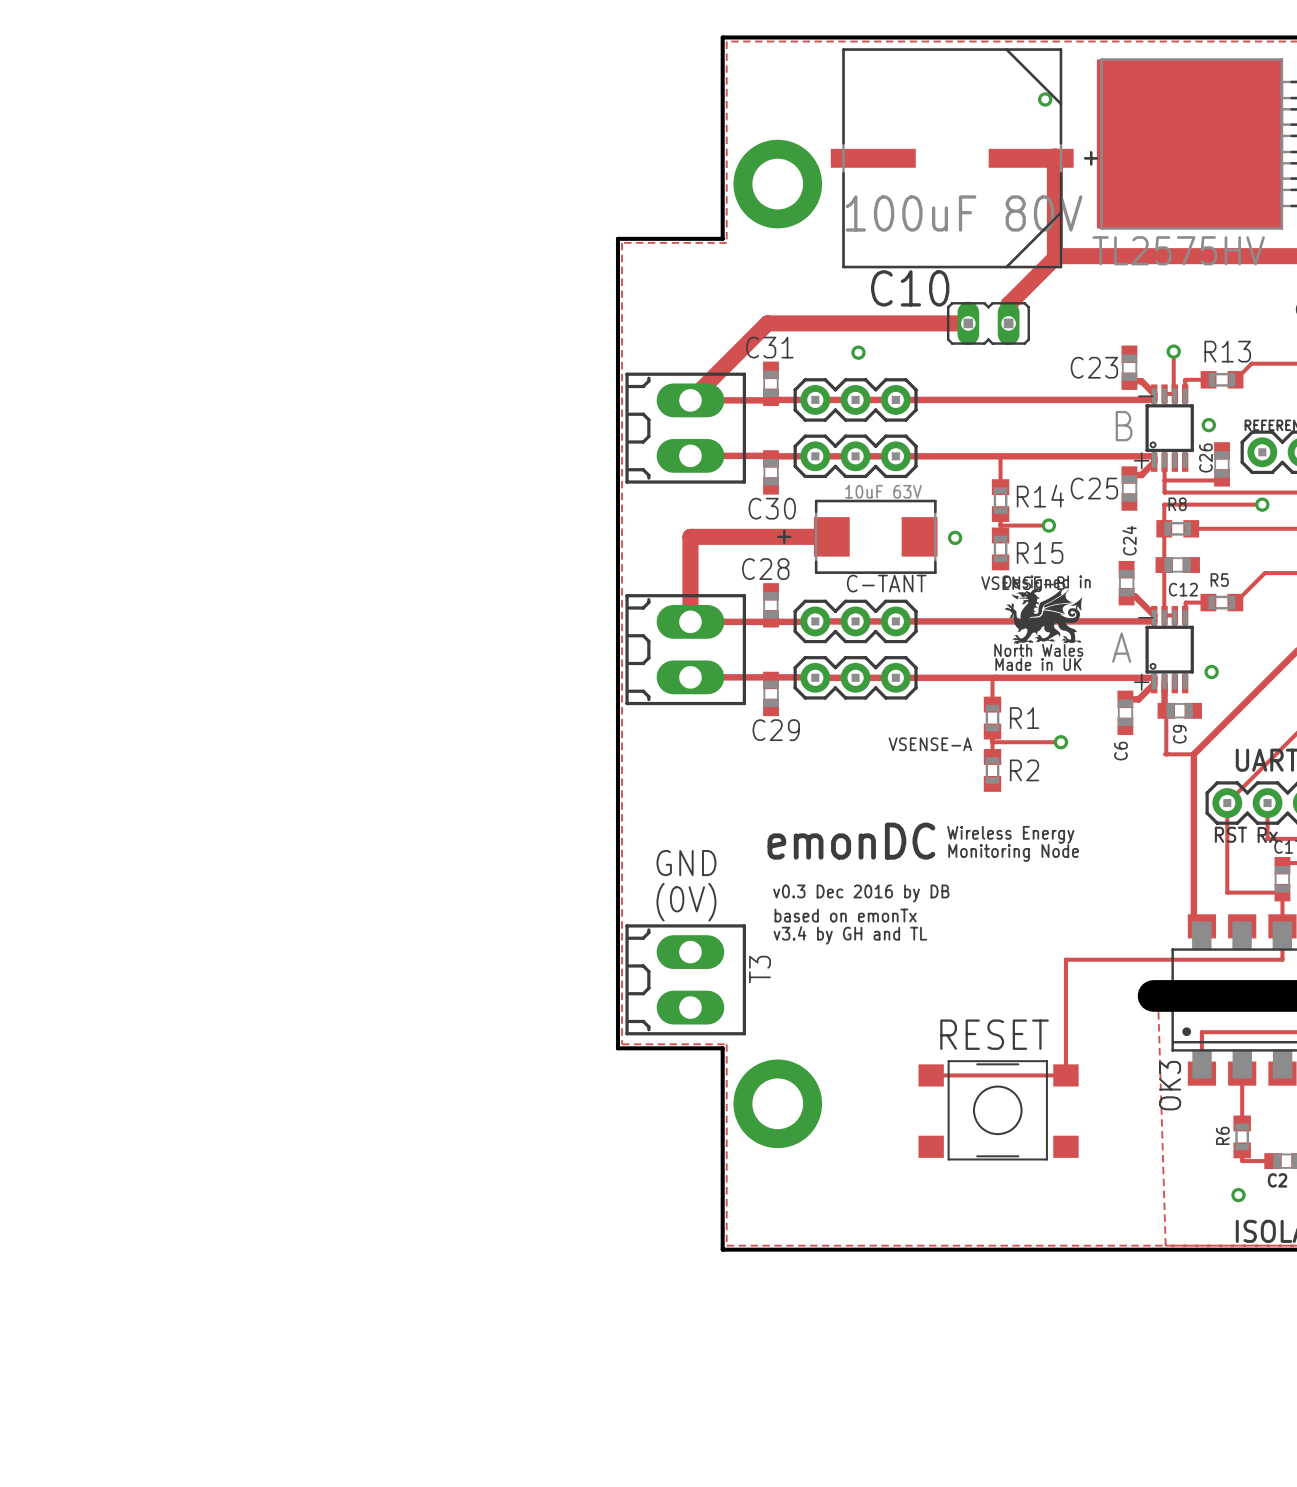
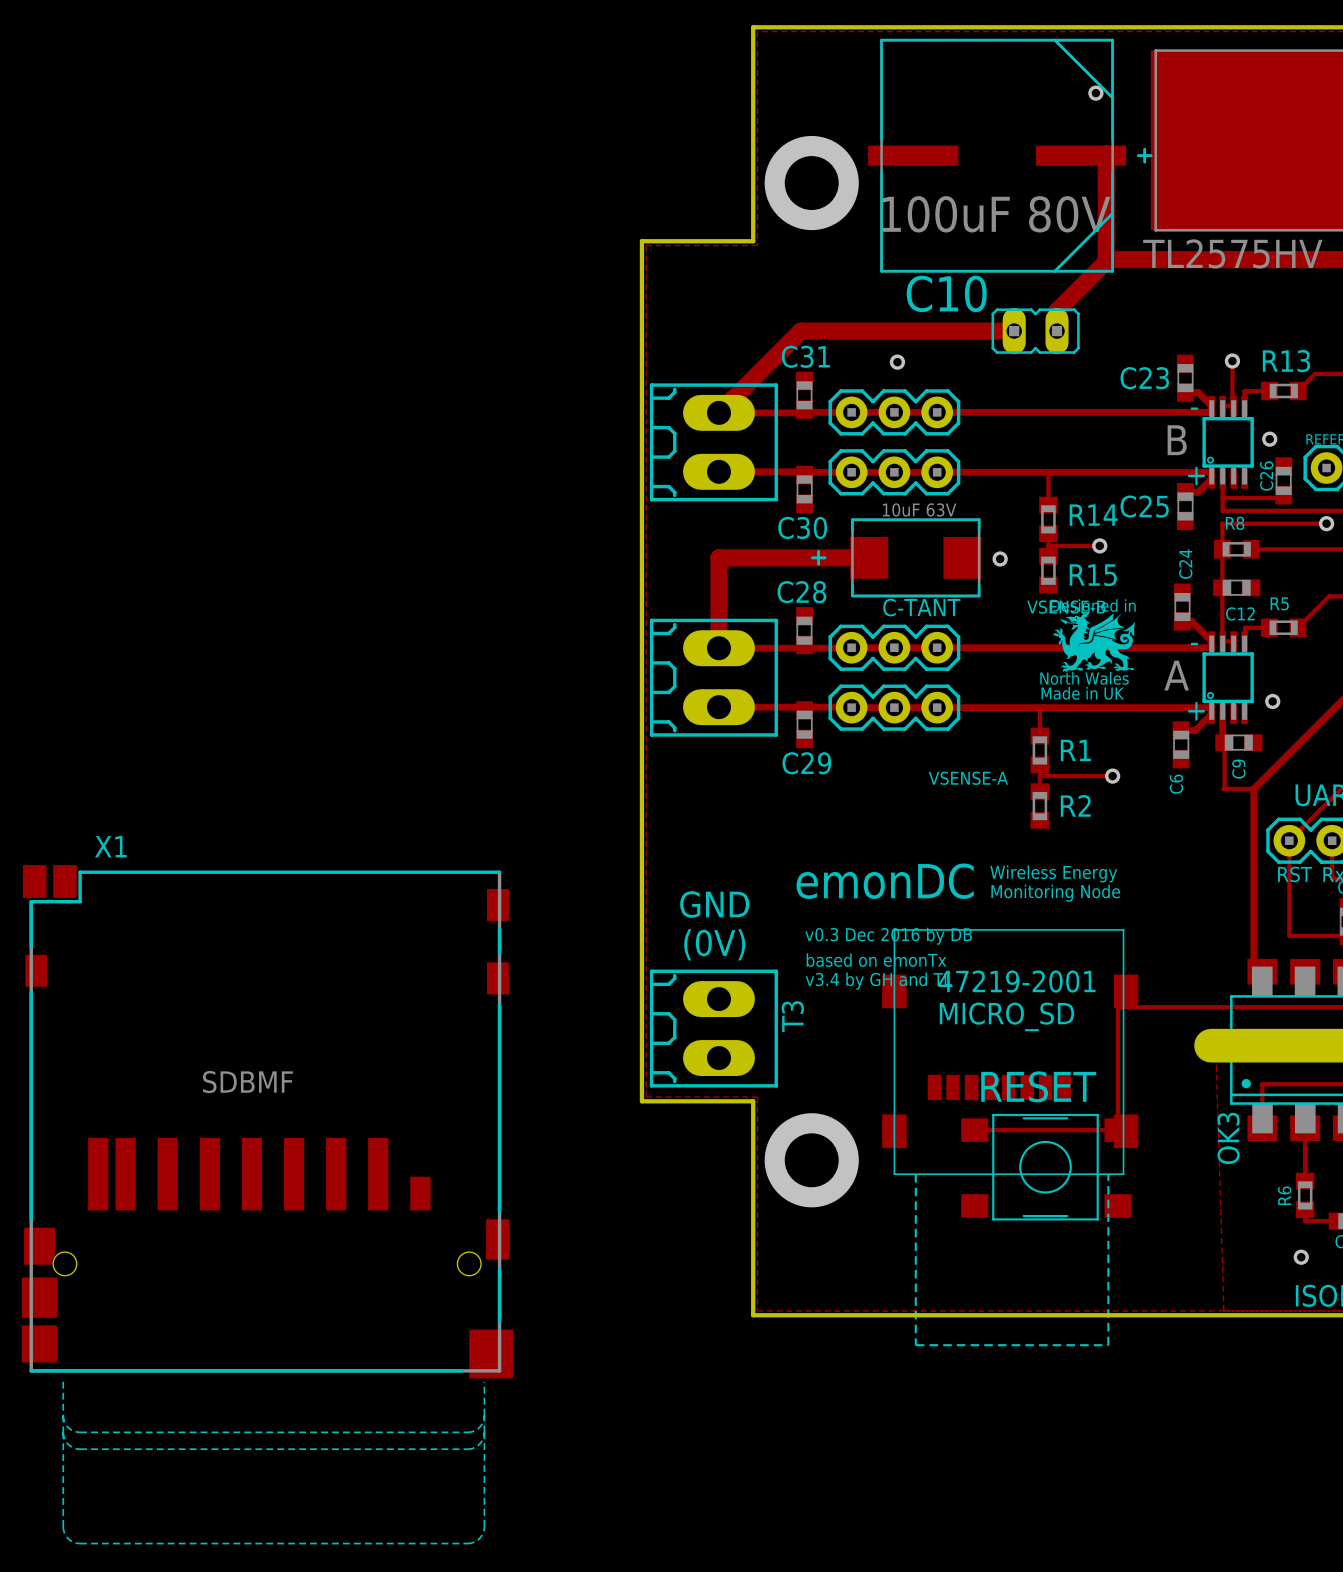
part: none -> (1010, 1137)
X1: none -> SDBMF (267, 1204)

